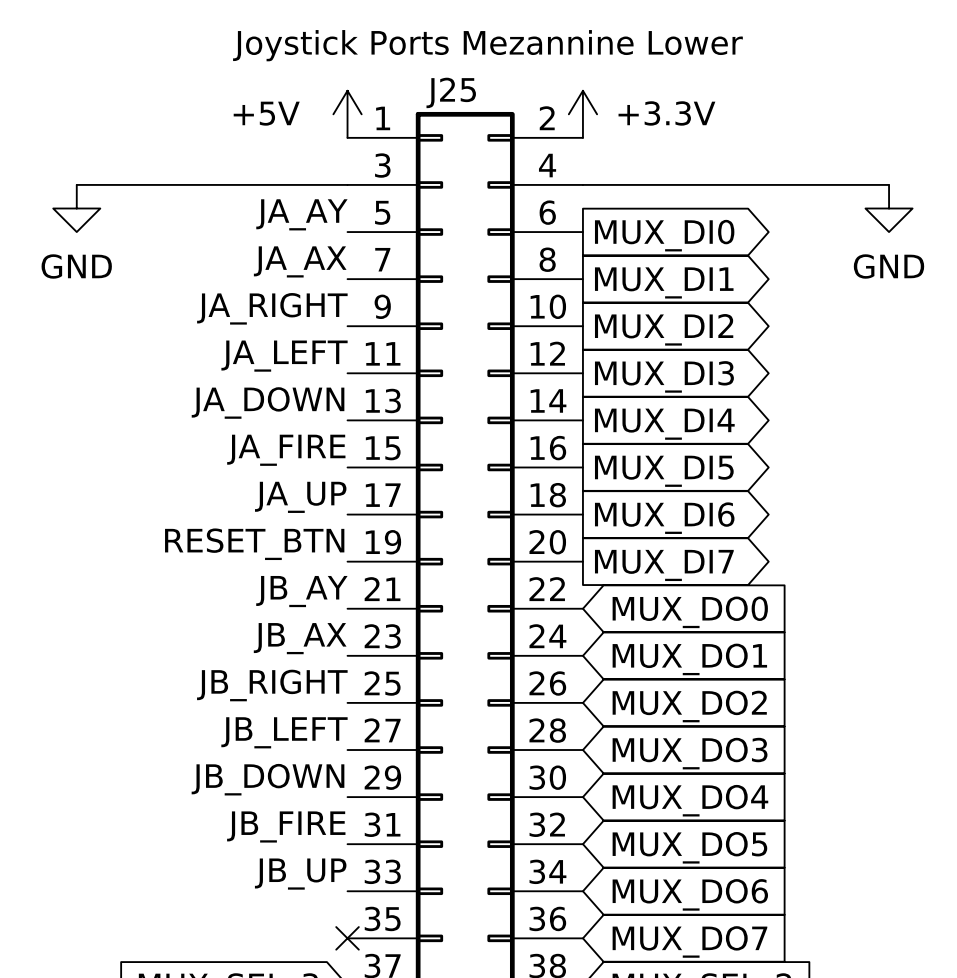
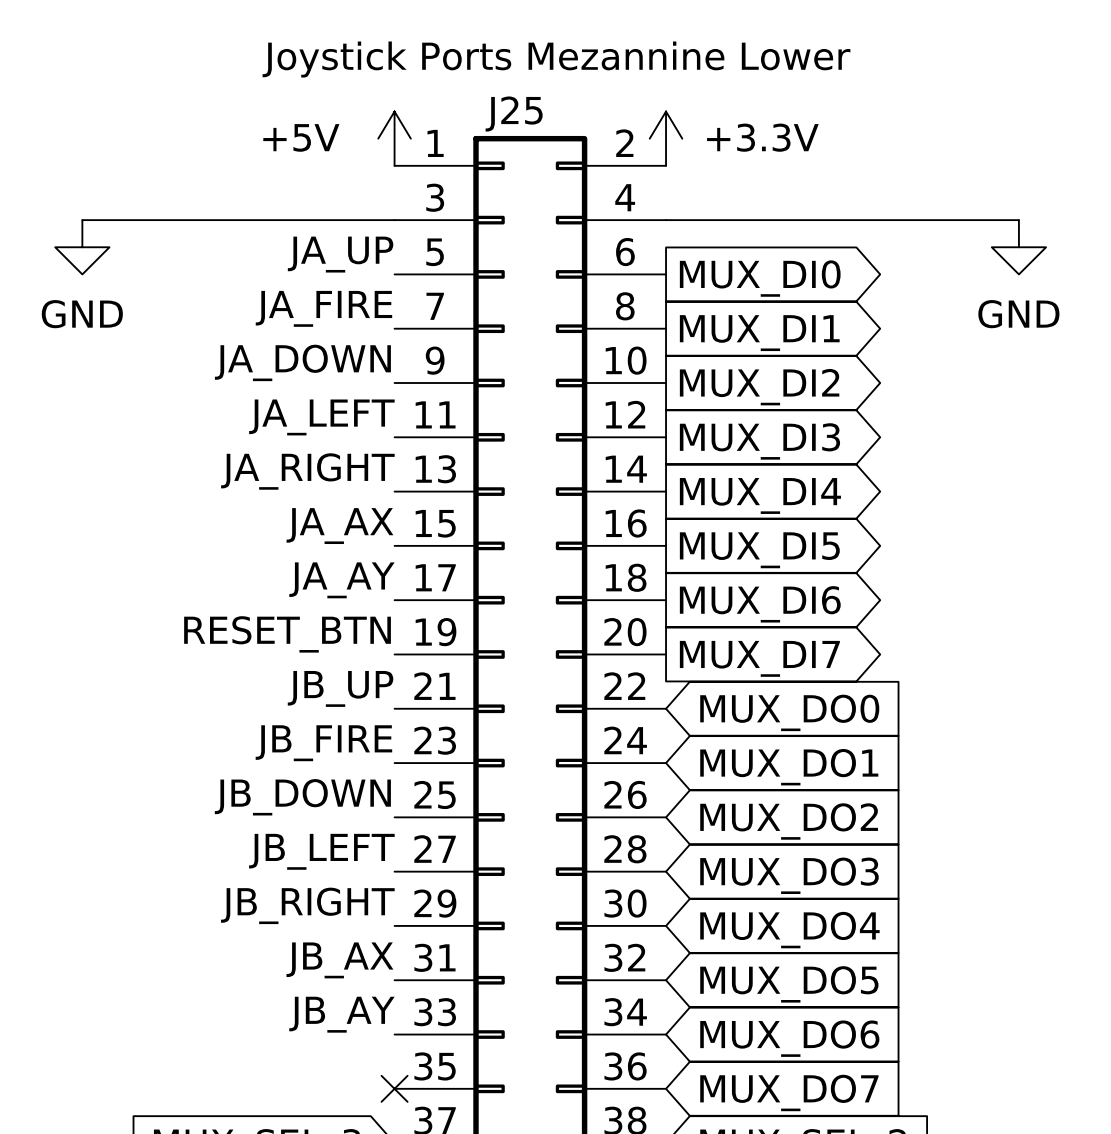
label: JA_AY (301, 214) -> JA_UP (340, 254)
label: JA_AX (300, 261) -> JA_FIRE (323, 308)
label: JA_RIGHT (272, 308) -> JA_DOWN (302, 362)
label: JA_DOWN (268, 402) -> JA_RIGHT (307, 471)
label: JA_FIRE (286, 450) -> JA_AX (339, 526)
label: JA_UP (300, 497) -> JA_AY (341, 580)
label: JB_AY (301, 591) -> JB_UP (340, 688)
label: JB_AX (300, 638) -> JB_FIRE (323, 743)
label: JB_RIGHT (272, 685) -> JB_DOWN (302, 797)
label: JB_DOWN (268, 779) -> JB_RIGHT (307, 905)
label: JB_FIRE (286, 826) -> JB_AX (339, 960)
label: JB_UP (300, 874) -> JB_AY (341, 1014)

